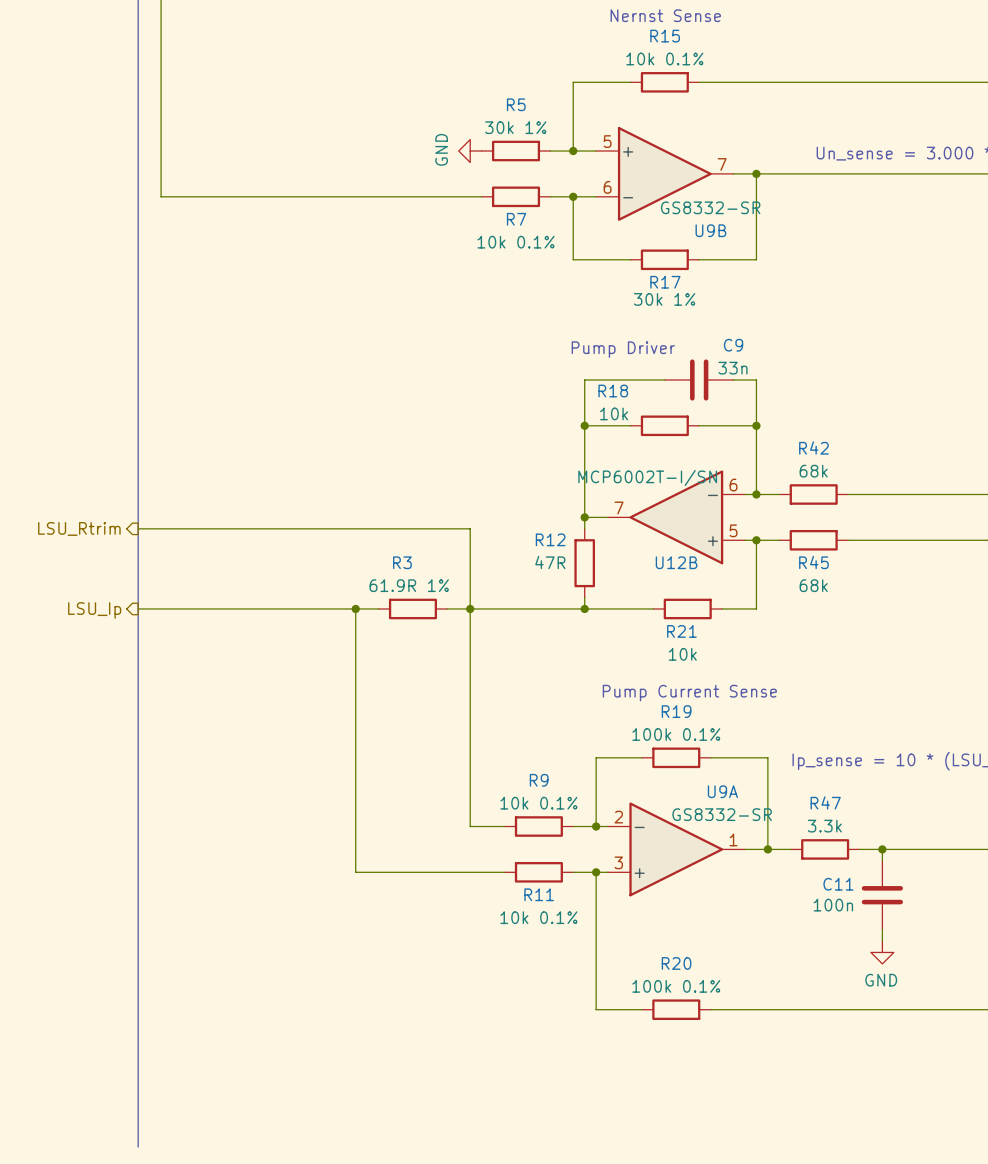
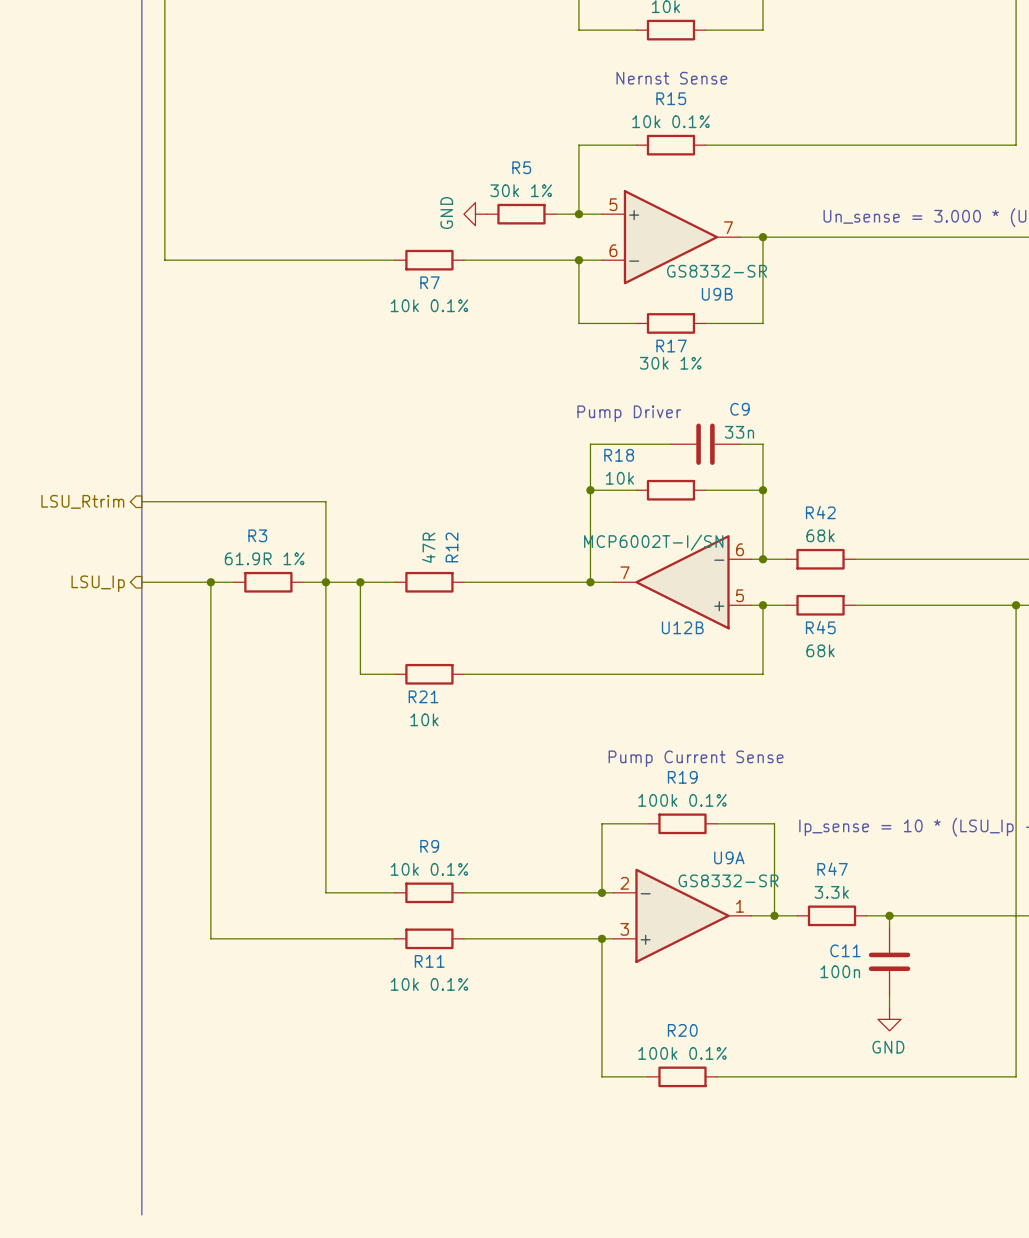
wire: (390, 196) (458, 196) -> (486, 260) (555, 260)
R7 position: (516, 196) -> (429, 260)
wire: none -> (141, 501) (325, 501) (325, 892) (394, 892)
wire: none -> (141, 582) (233, 582)
junction: none -> (210, 582)
wire: none -> (302, 582) (394, 582)
junction: none -> (325, 582)
wire: none -> (360, 582) (360, 674)
junction: none -> (360, 582)
wire: (584, 517) (584, 528) -> (590, 582) (463, 582)
hierarchical label position: LSU_Rtrim (79, 528) -> LSU_Rtrim (82, 501)
wire: (138, 528) (470, 528) (470, 826) -> (463, 892) (475, 892)
R12 rotation: 0° (584, 563) -> 90° clockwise (429, 582)
R12 position: (584, 563) -> (429, 582)
wire: (584, 597) (584, 608) -> none
wire: (138, 608) (355, 608) (355, 872) -> (210, 582) (210, 938) (360, 938)
junction: (355, 608) -> none
R3 position: (412, 608) -> (268, 582)
junction: (470, 608) -> none
junction: (584, 608) -> none
wire: none -> (659, 674) (728, 674)
R21 position: (687, 608) -> (429, 674)
hierarchical label position: LSU_Ip (94, 610) -> LSU_Ip (98, 583)
wire: none -> (509, 892) (578, 892)
R9 position: (538, 826) -> (429, 892)
wire: (390, 872) (458, 872) -> (509, 938) (578, 938)
R11 position: (538, 872) -> (429, 938)

